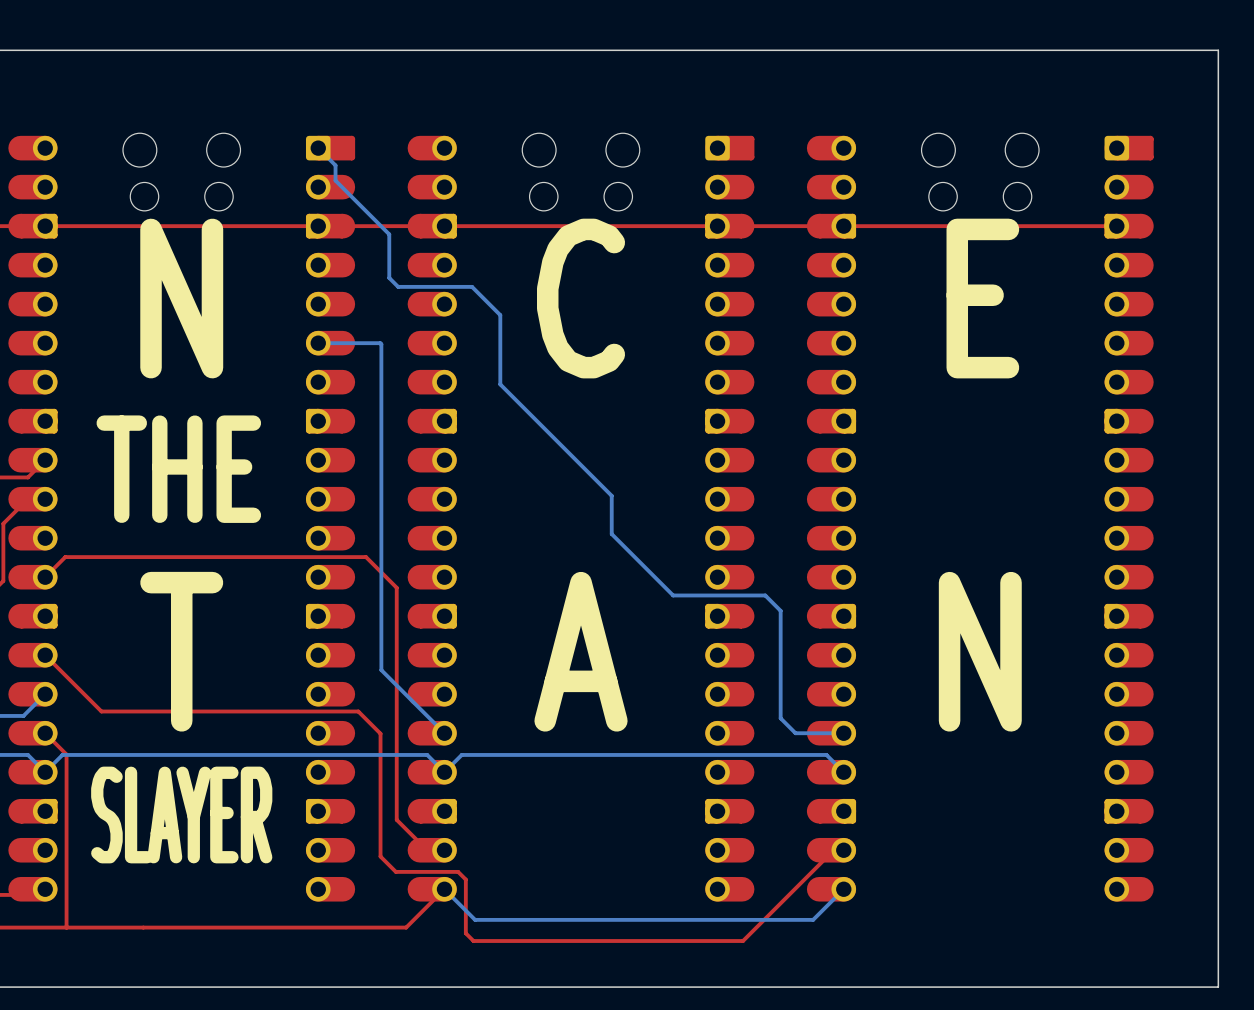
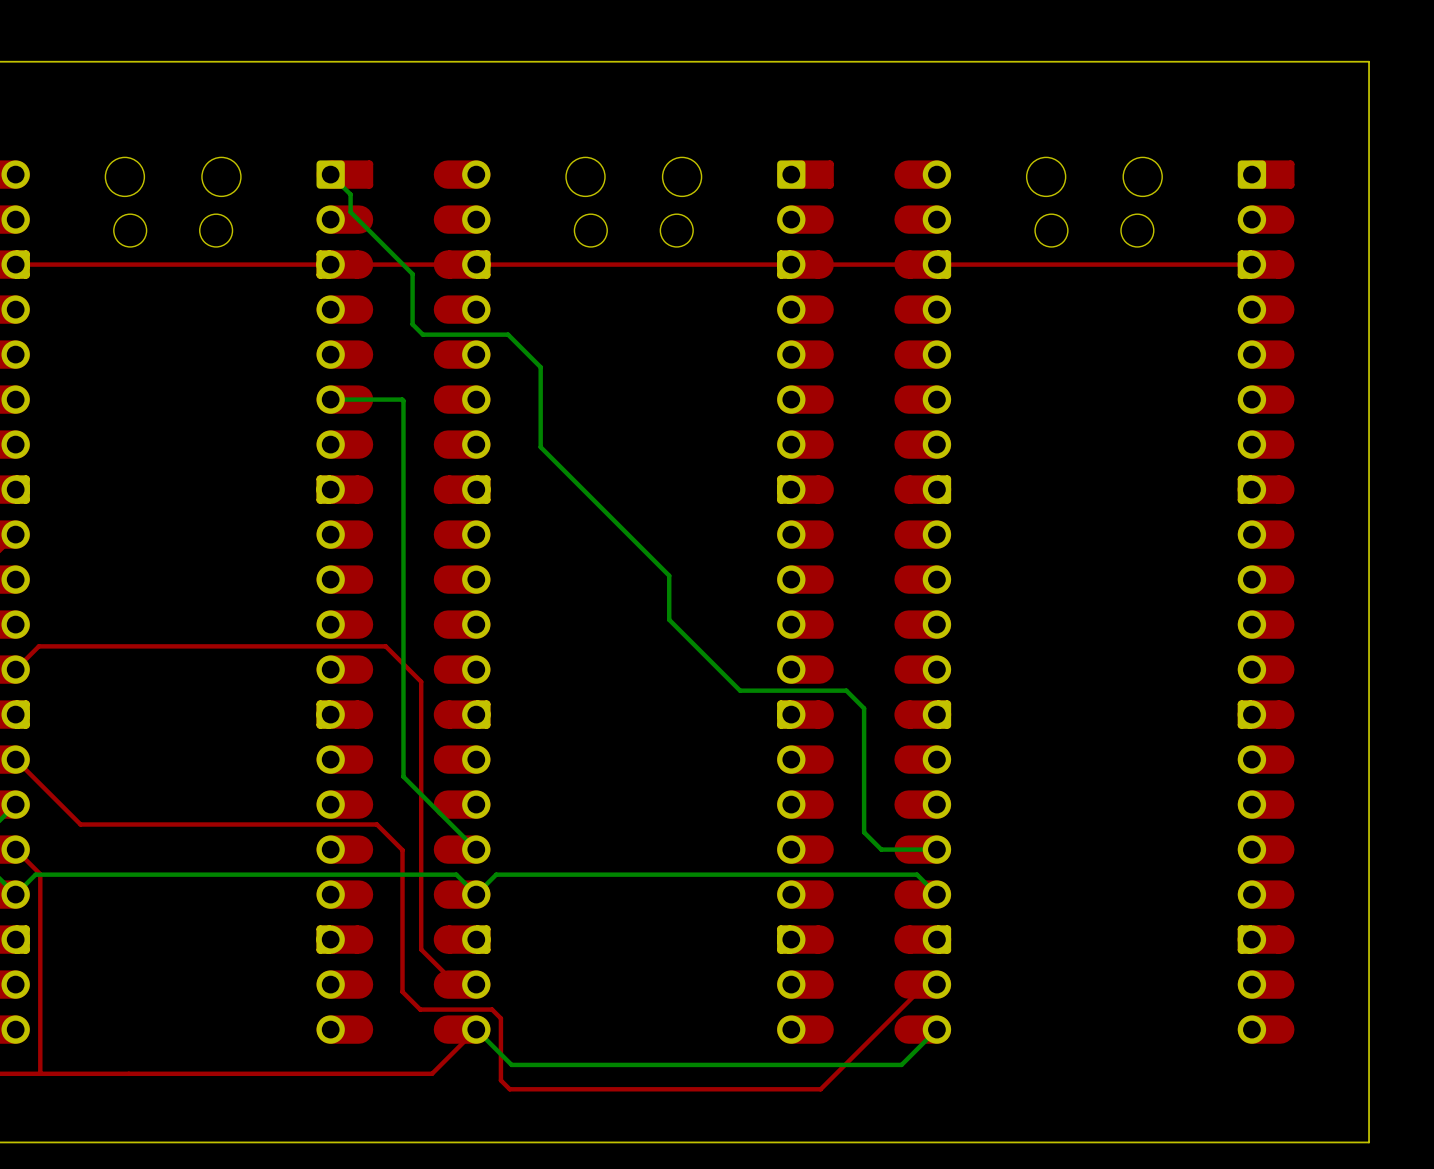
text: N (181, 298) -> none
text: C (581, 298) -> none
text: E (982, 298) -> none
text: THE (178, 469) -> none
text: T (181, 651) -> none
text: A (581, 651) -> none
text: N (980, 651) -> none
text: SLAYER (181, 815) -> none

